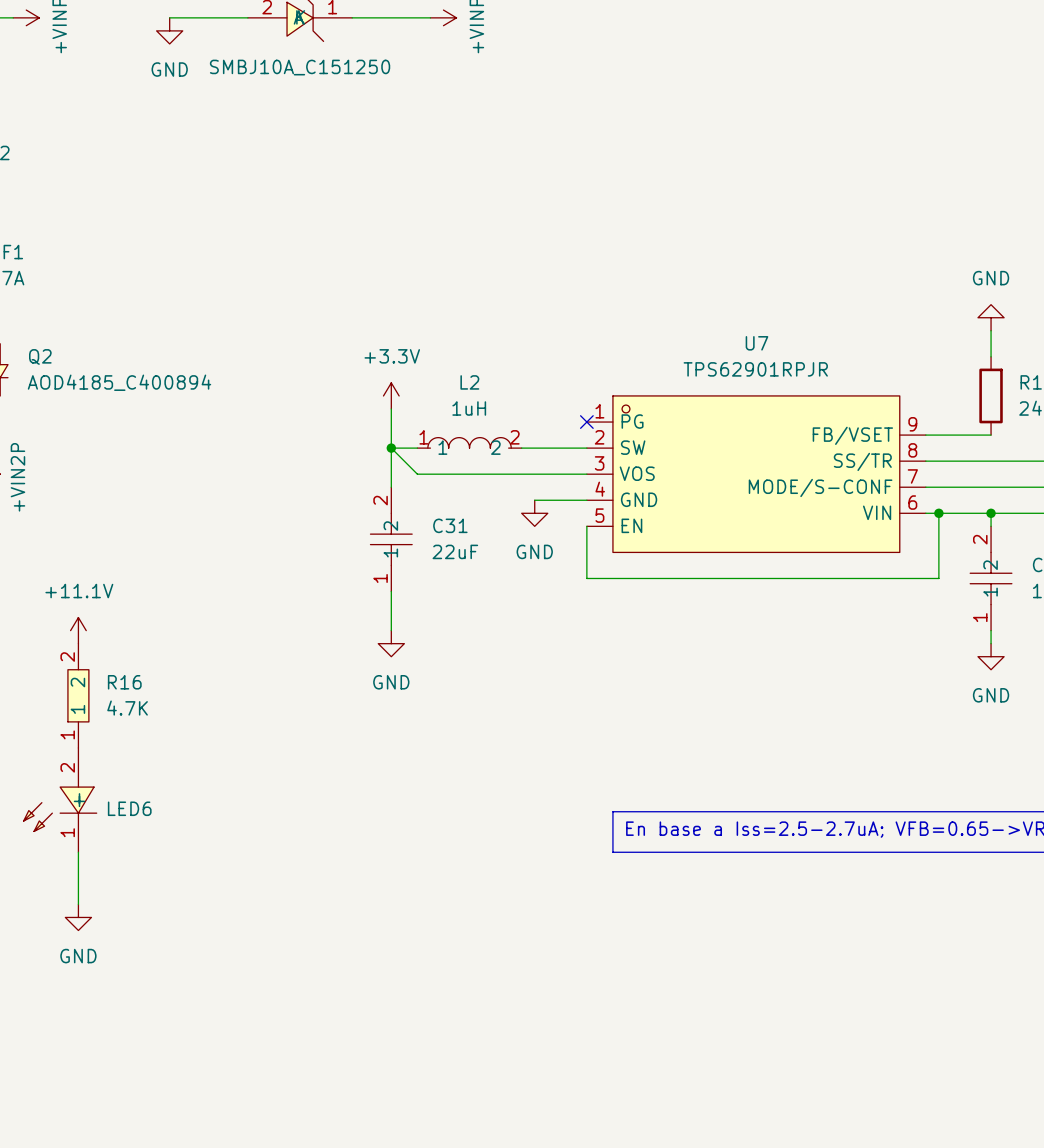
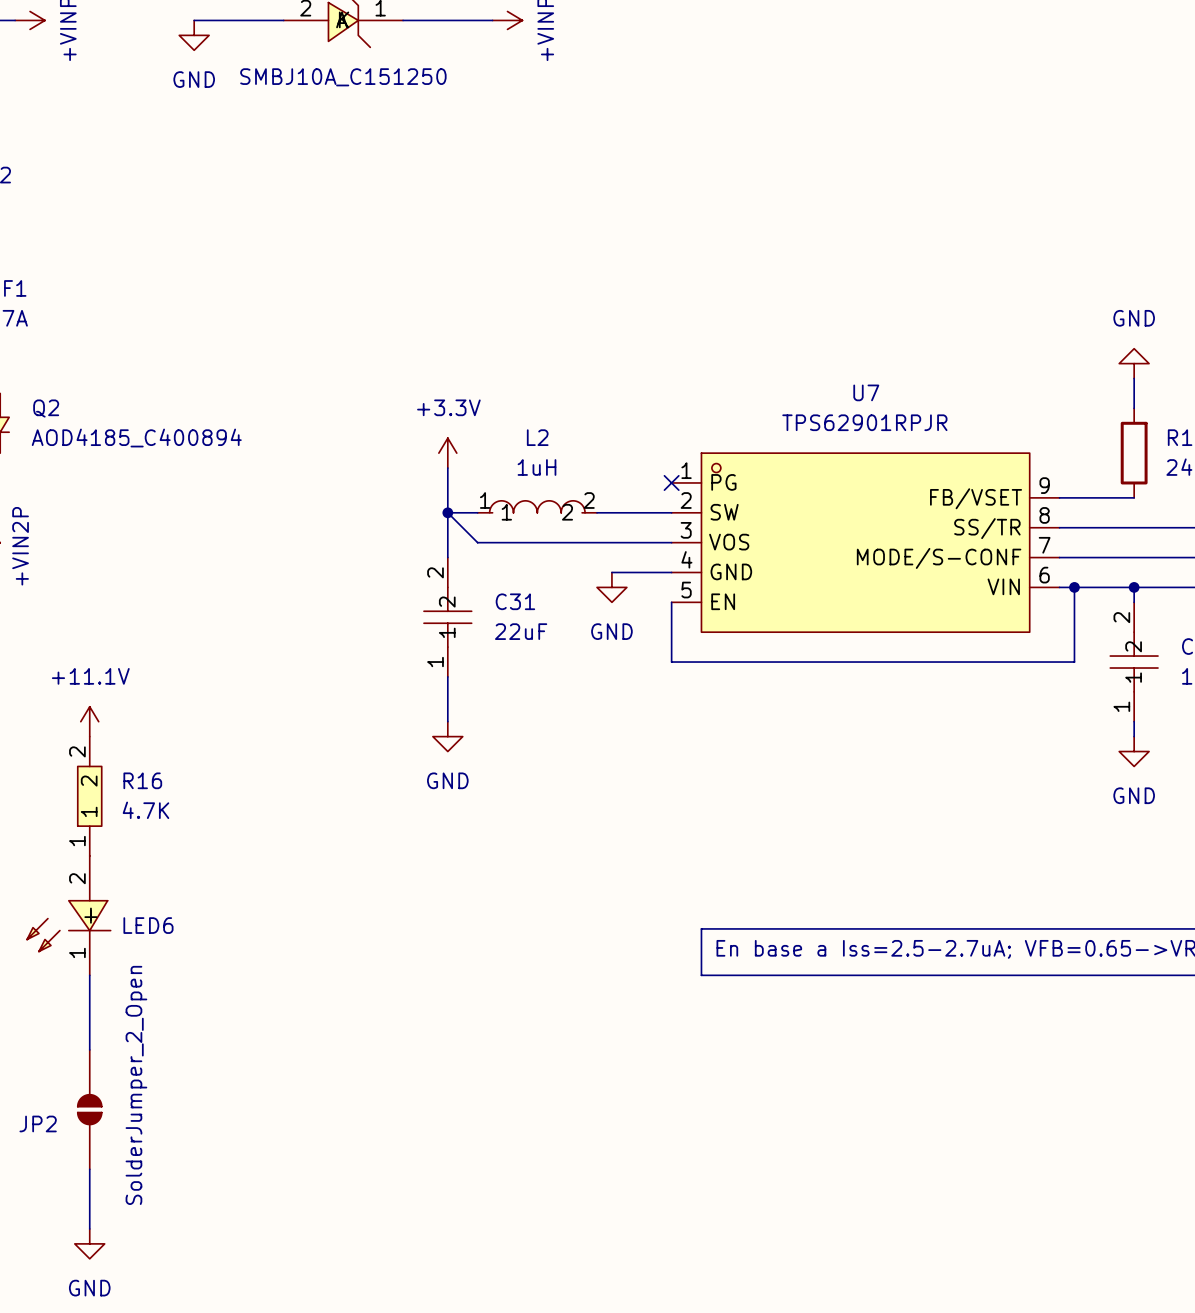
power symbol position: GND (78, 917) -> GND (89, 1243)
JP2: none -> SolderJumper_2_Open (89, 1109)
wire: none -> (89, 1169) (89, 1228)

